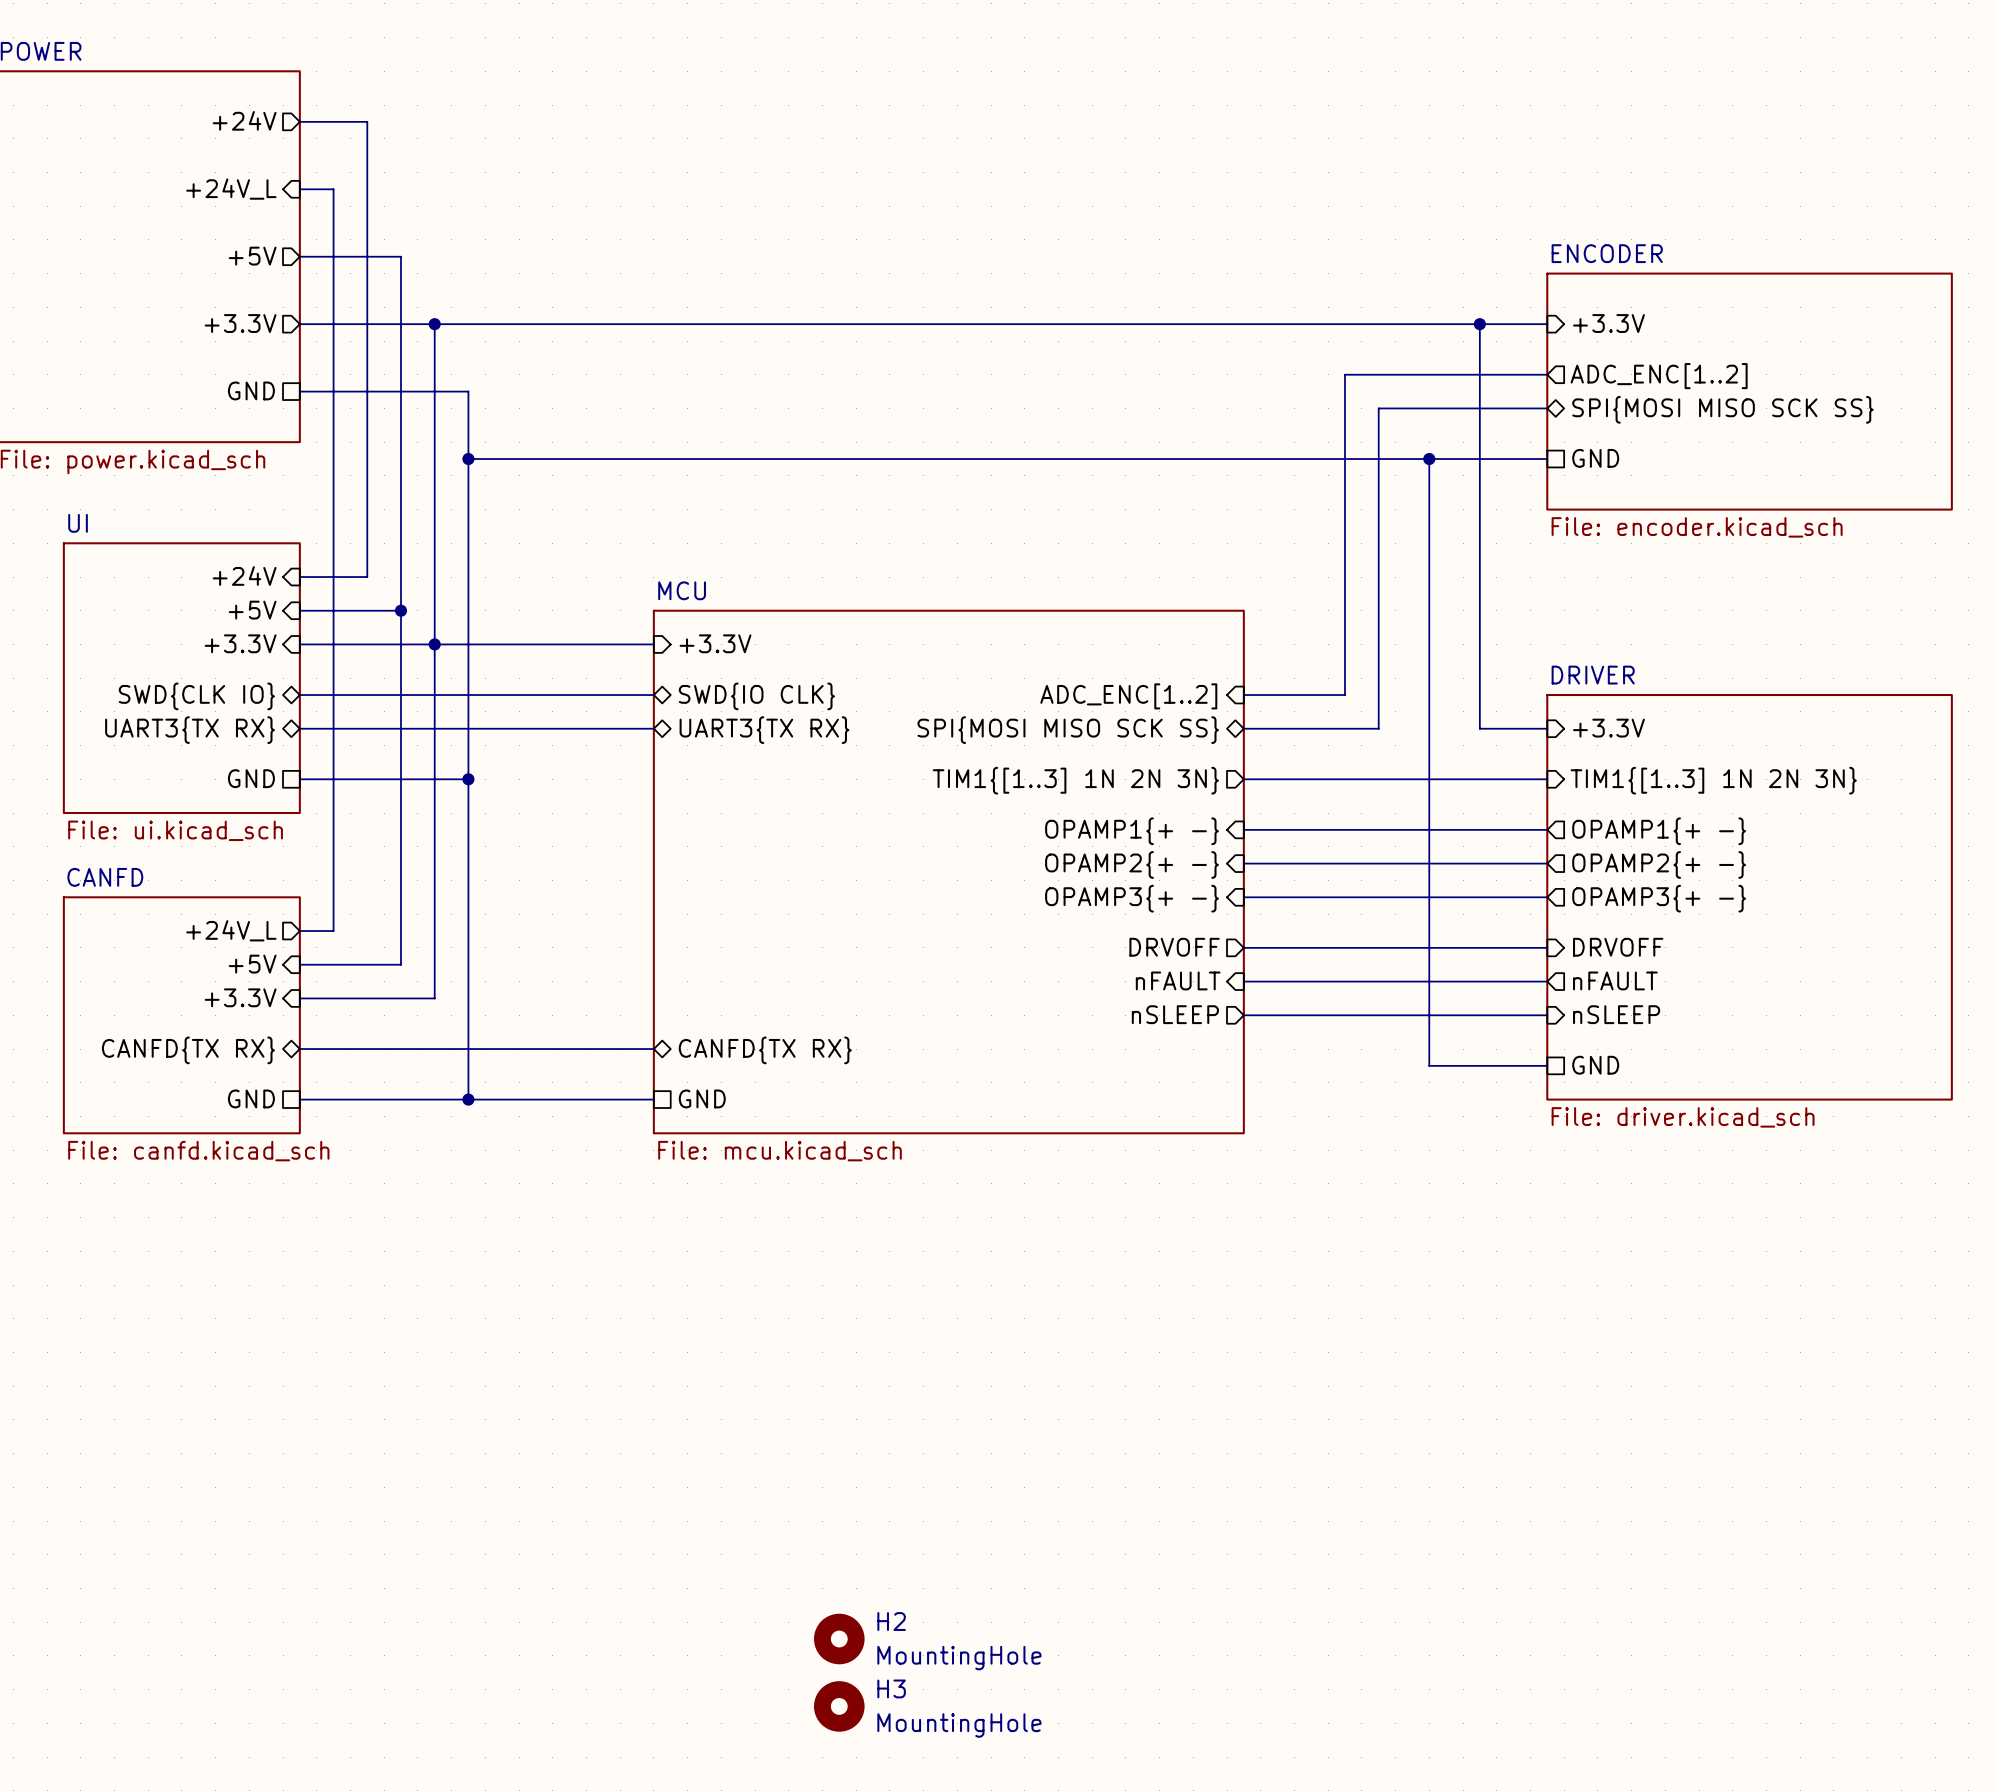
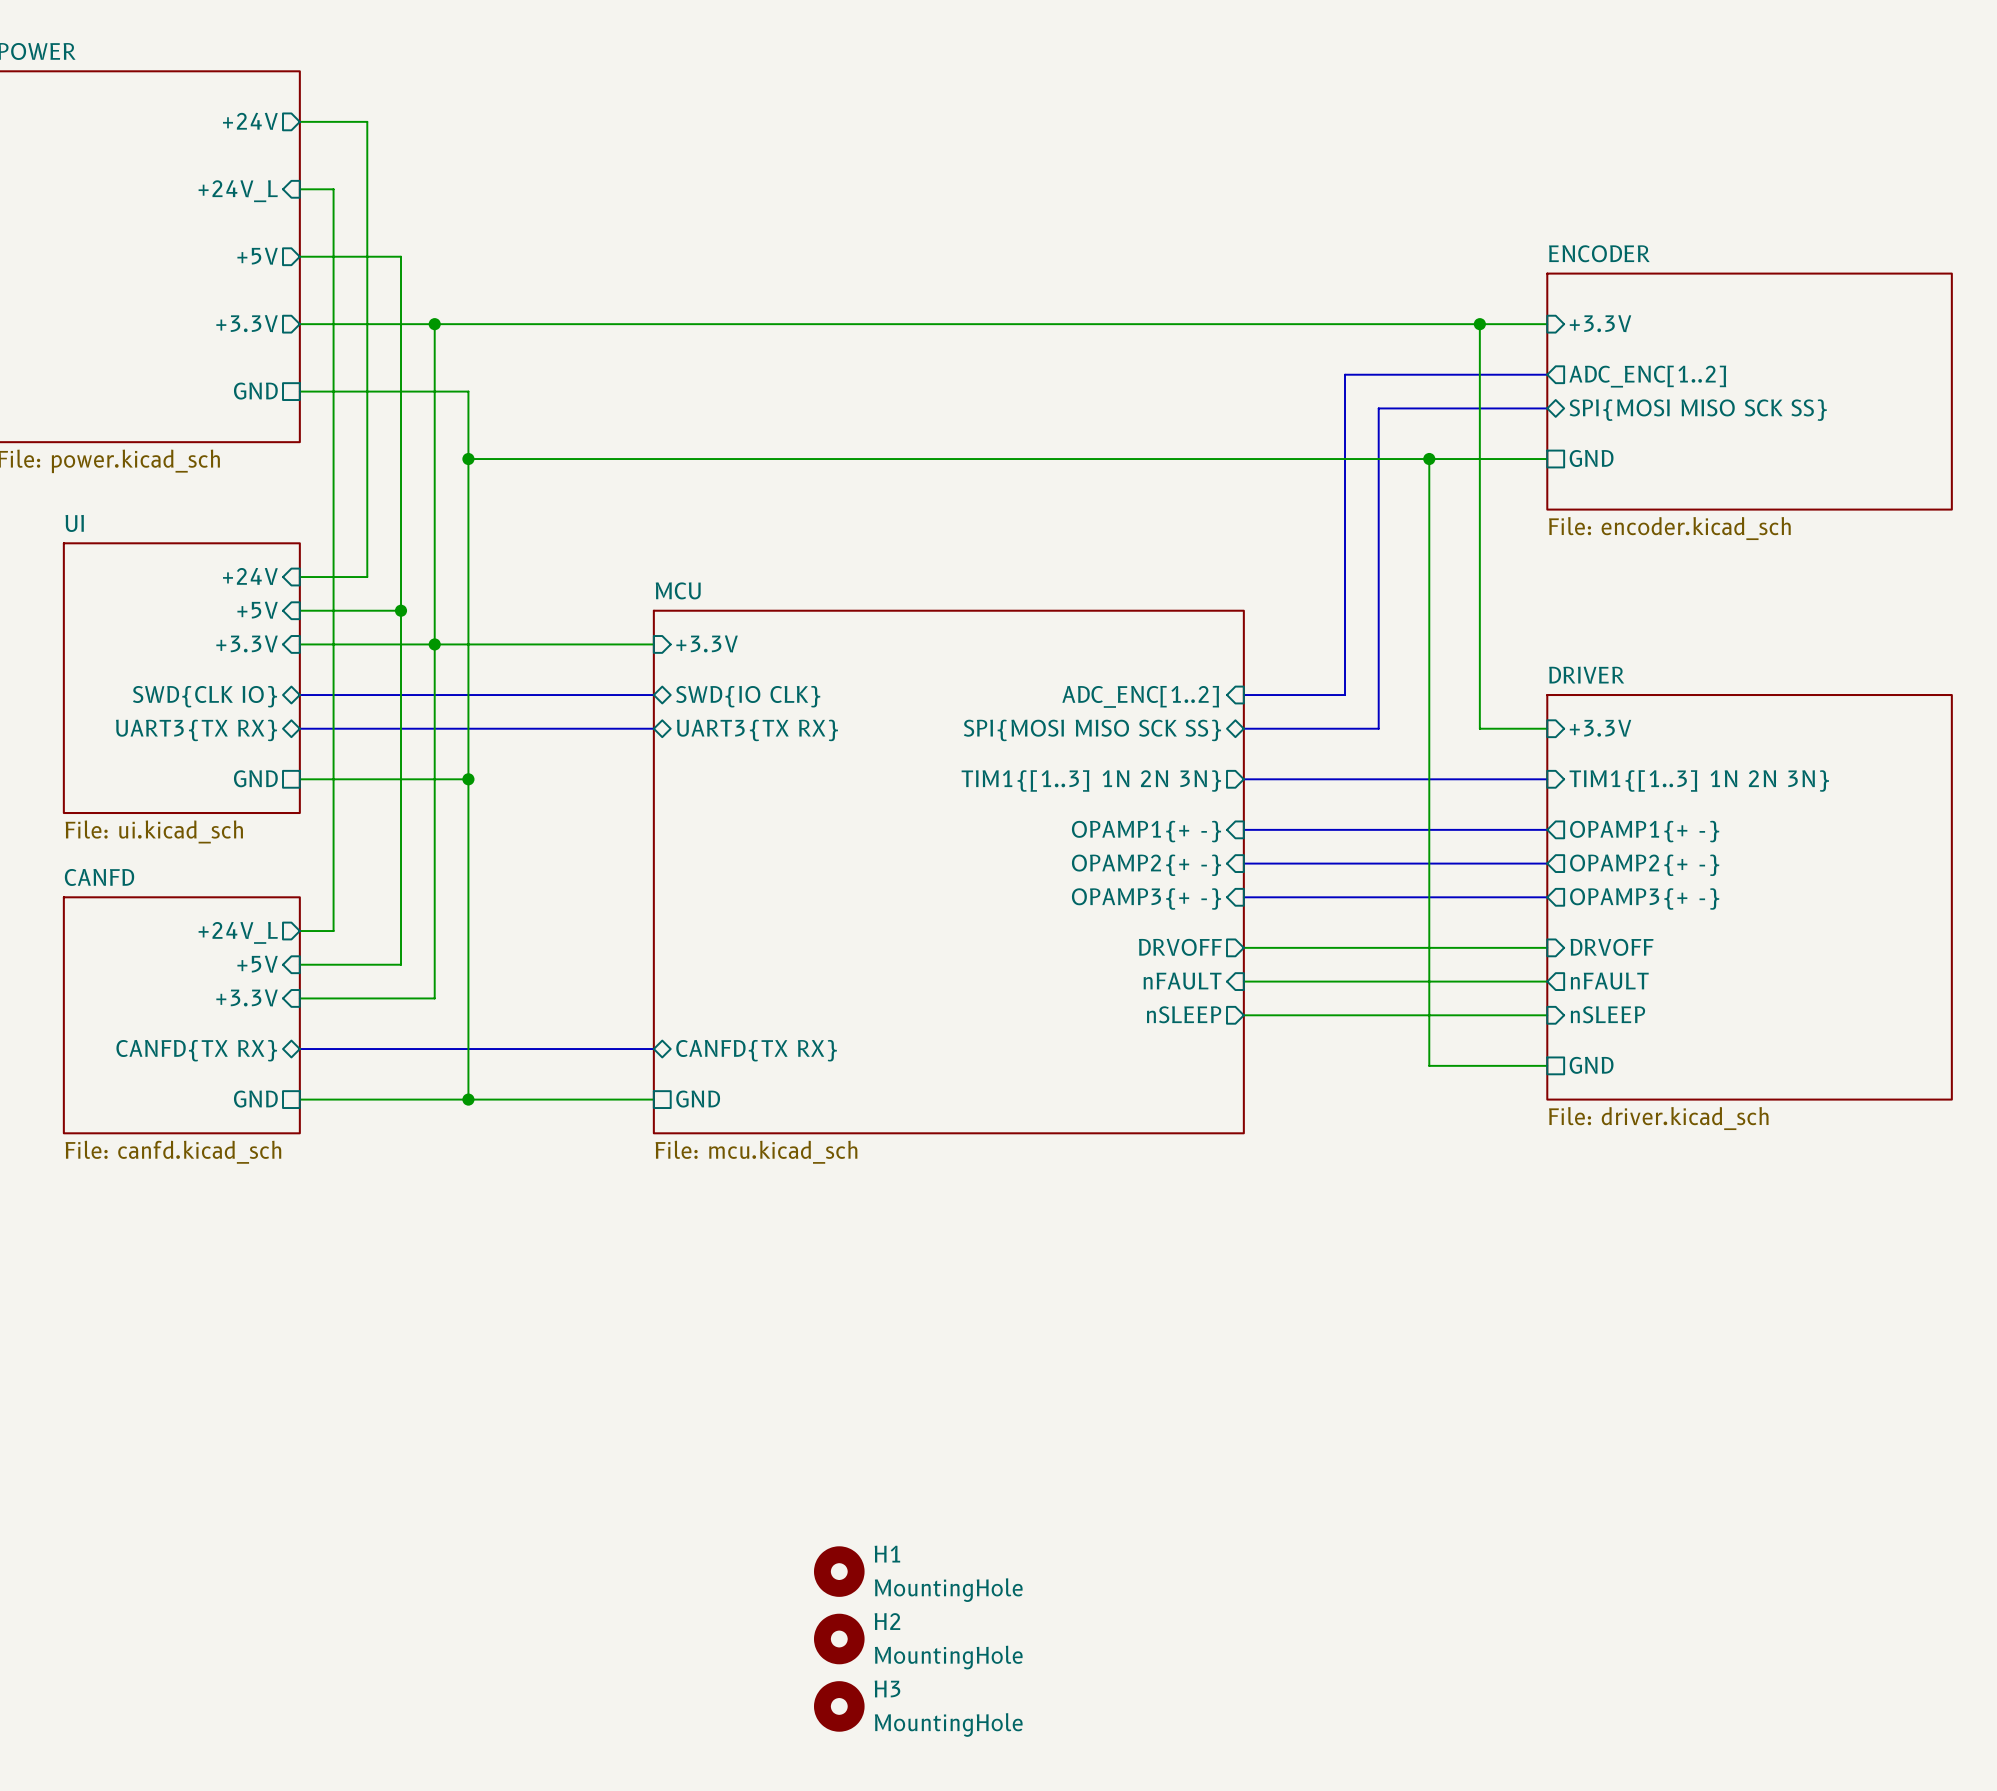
H1: none -> MountingHole (839, 1571)

